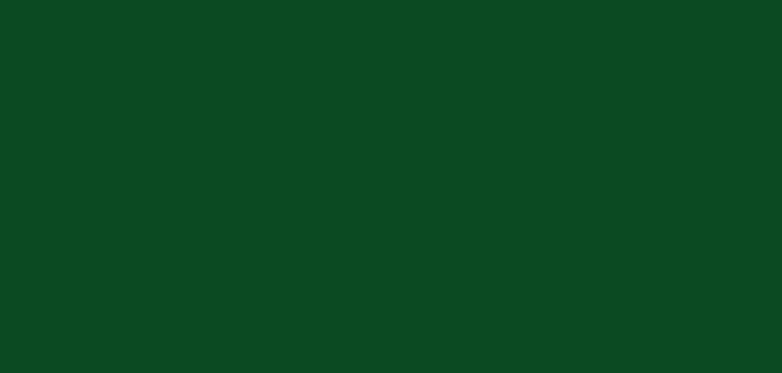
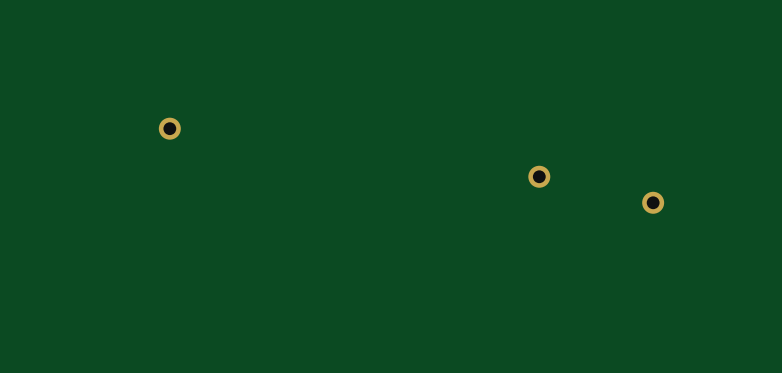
via: none -> (169, 128)
via: none -> (539, 176)
via: none -> (653, 202)

